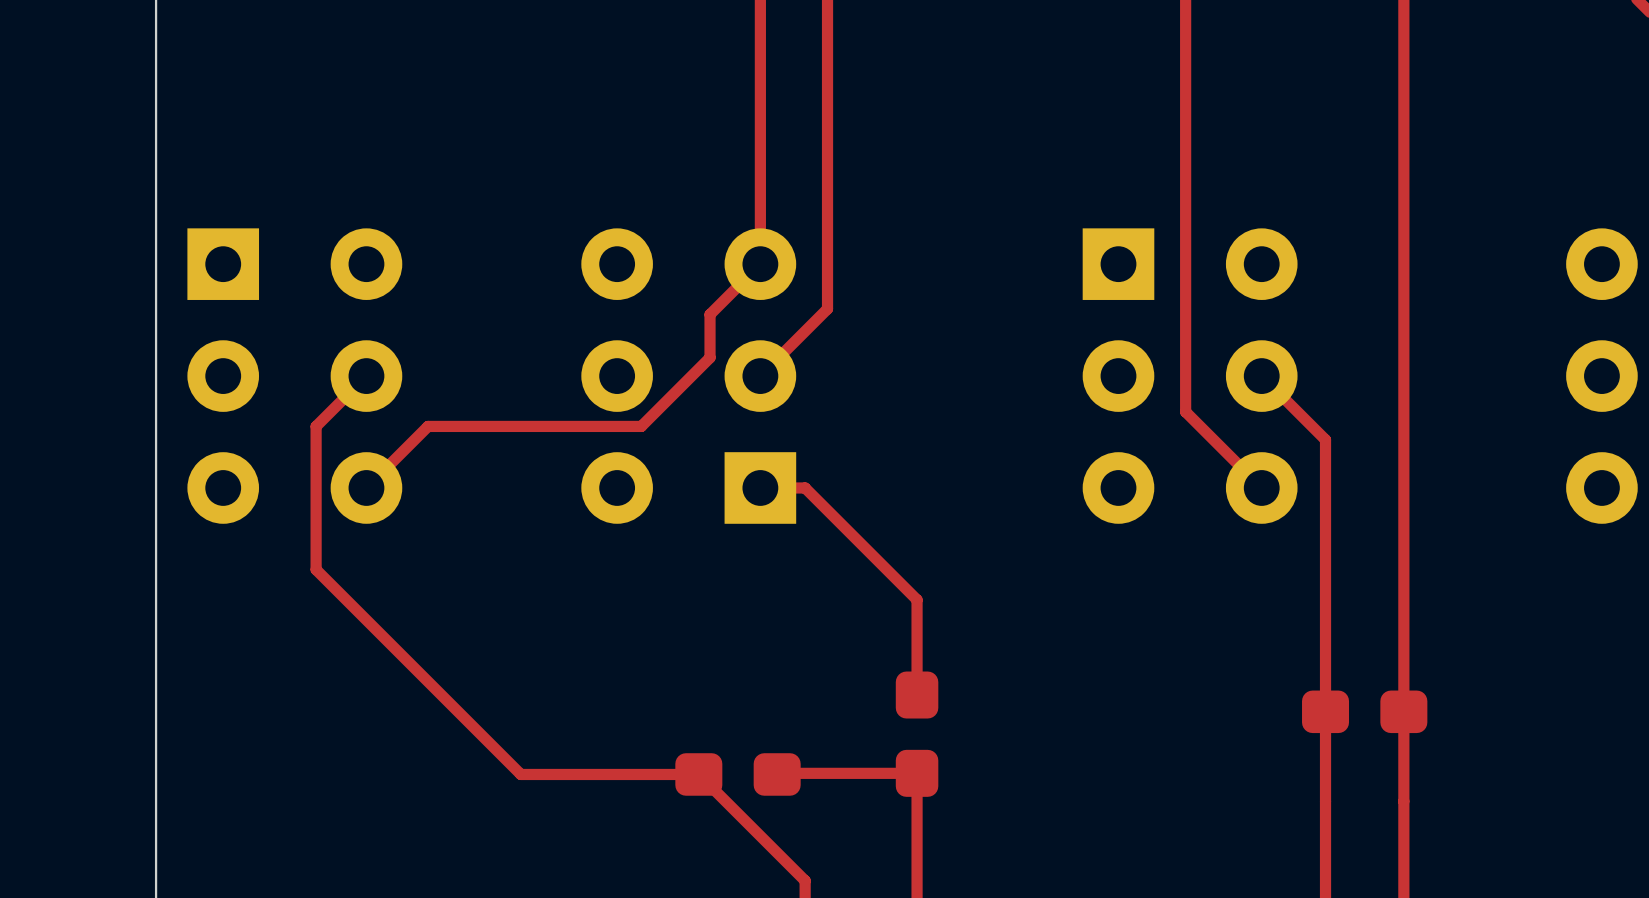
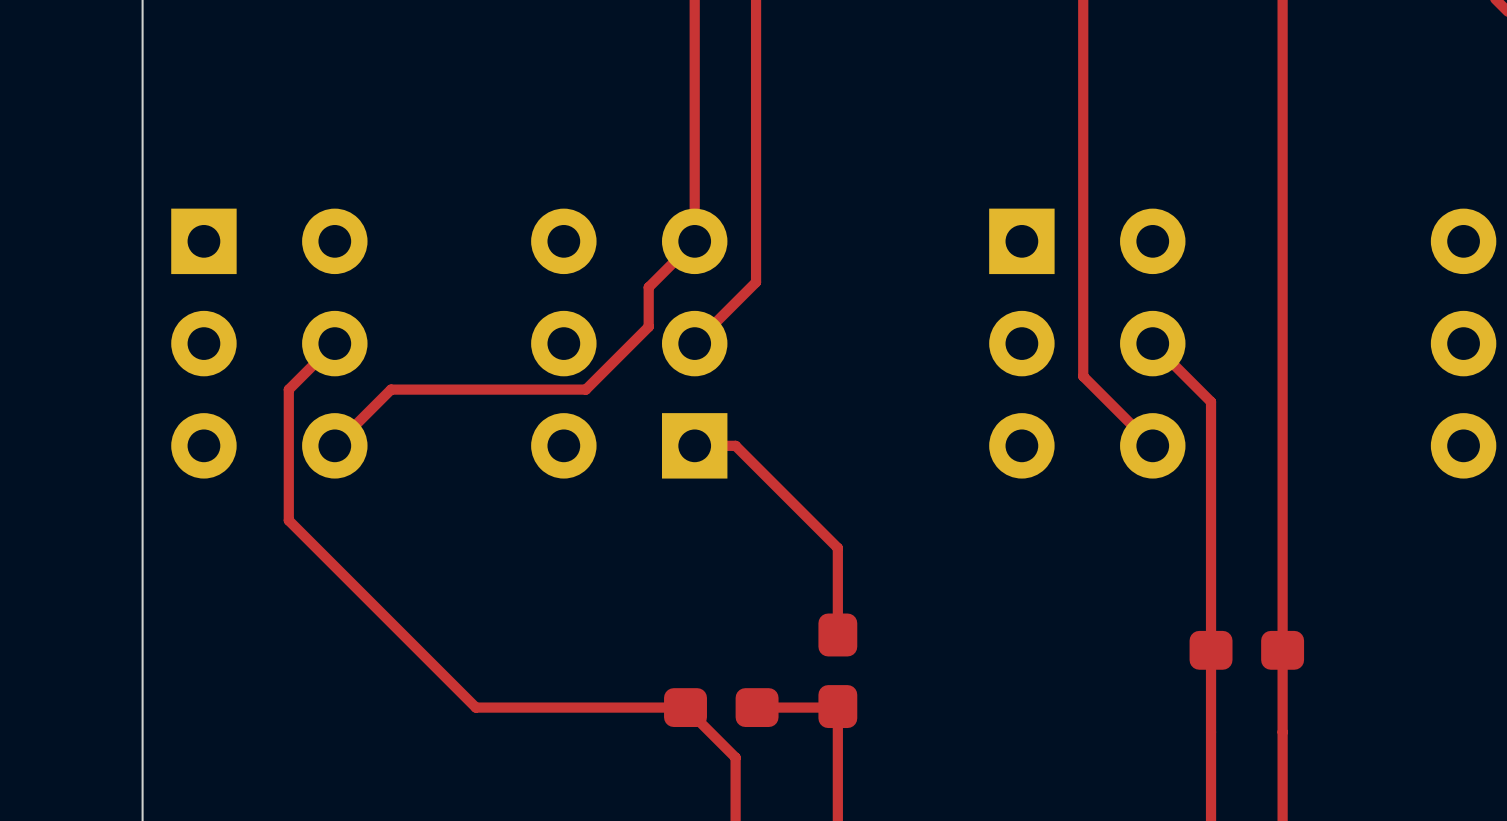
top track: (917, 773) (777, 774) -> (837, 706) (757, 707)
top track: (698, 774) (805, 880) -> (638, 707) (685, 707) (735, 757) (735, 804)
part position: (738, 774) -> (721, 707)

